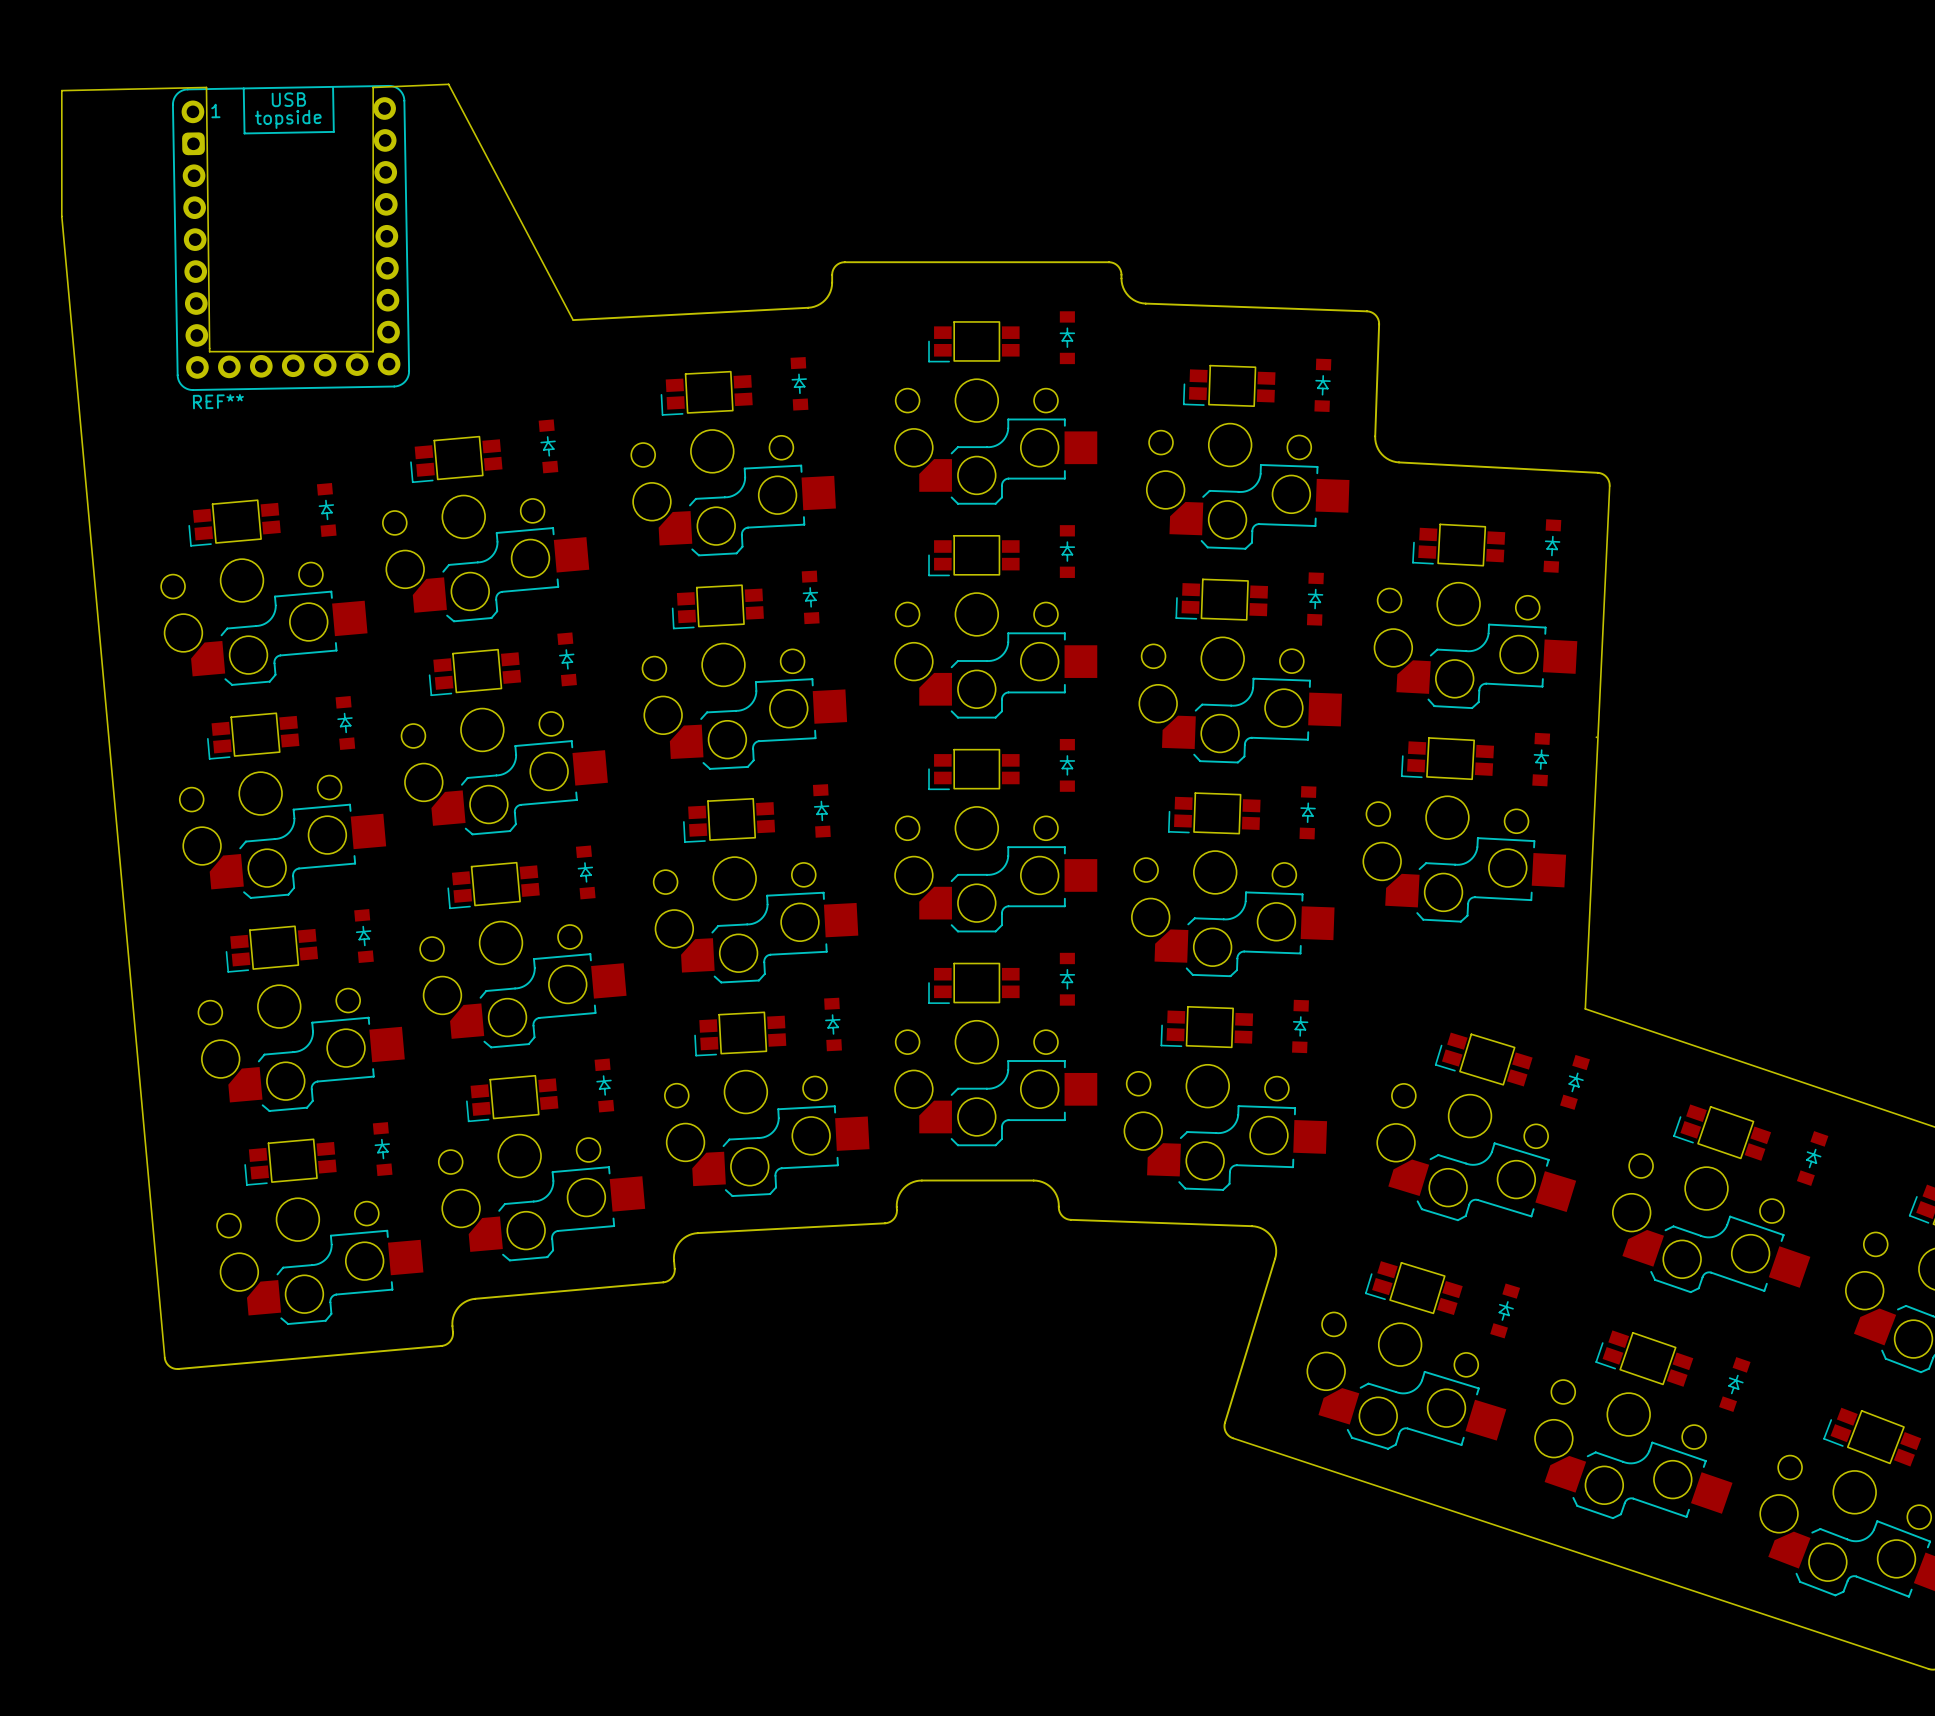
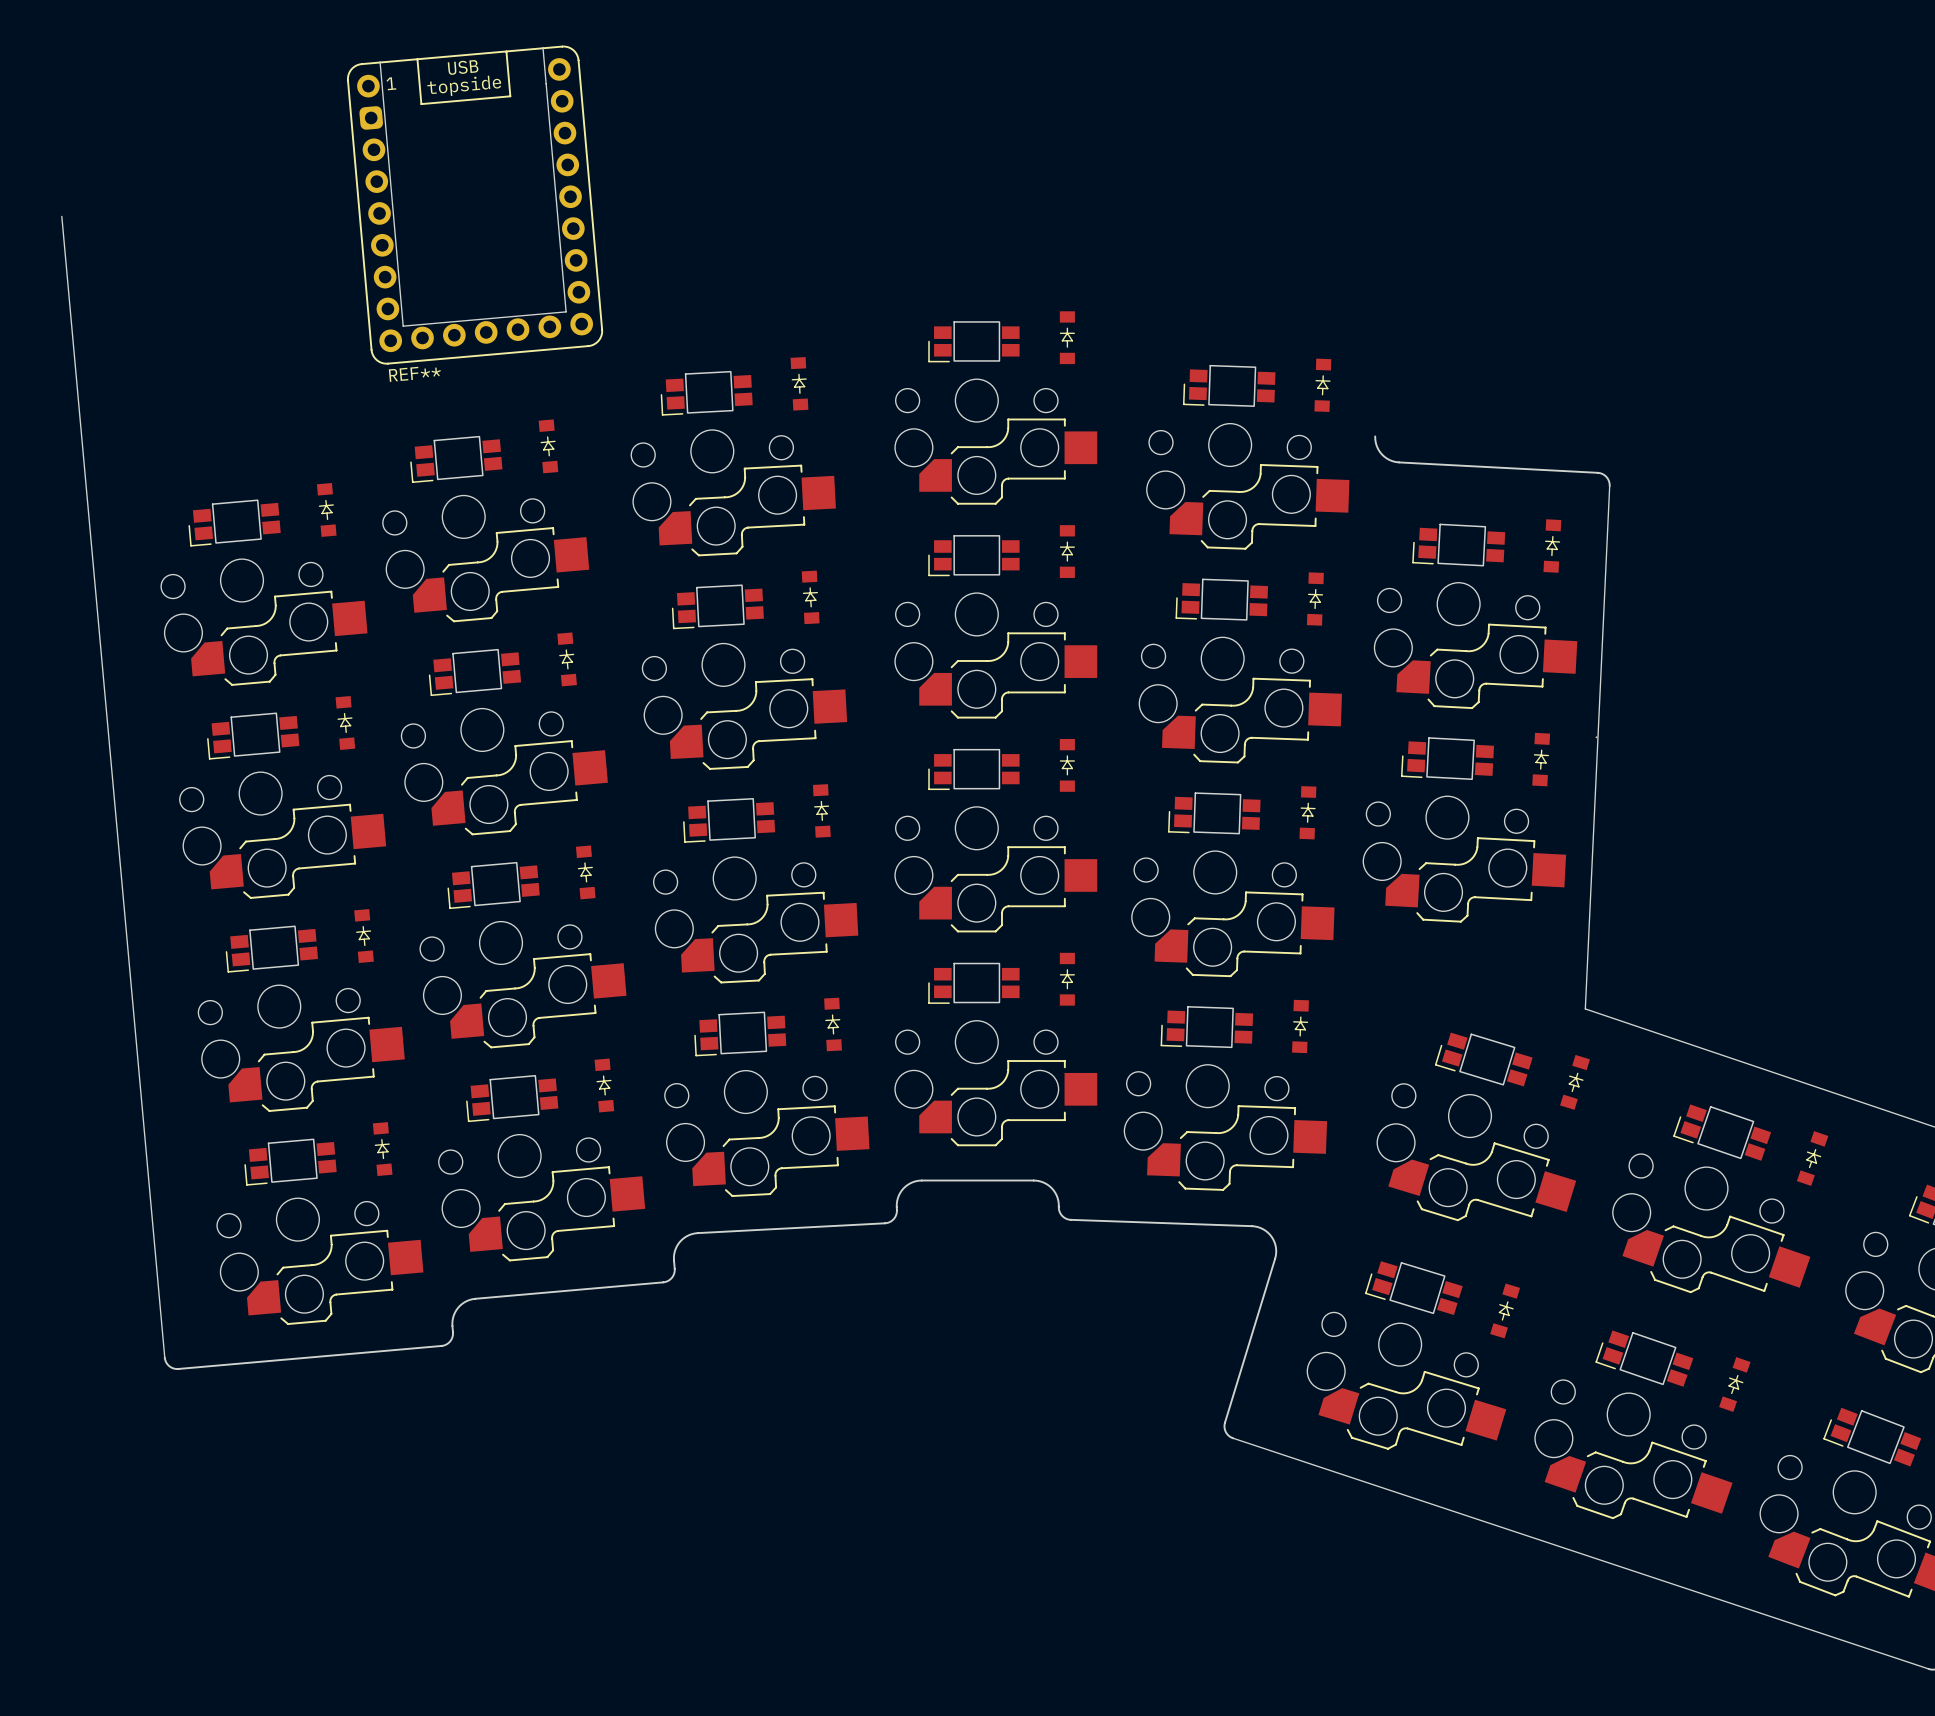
board edge: none -> (542, 47) (566, 311) (403, 326) (380, 61)
REF**: none -> (475, 205)
board edge: (61, 216) (61, 90) (206, 87) (209, 351) (373, 351) (373, 87) (448, 84) (573, 320) (811, 307) (820, 303) (827, 297) (831, 288) (833, 269) (837, 264) (843, 262) (1110, 262) (1119, 268) (1122, 284) (1126, 293) (1133, 299) (1142, 303) (1366, 311) (1373, 313) (1378, 318) (1379, 324) (1375, 436) -> none
REF**: (291, 237) -> none

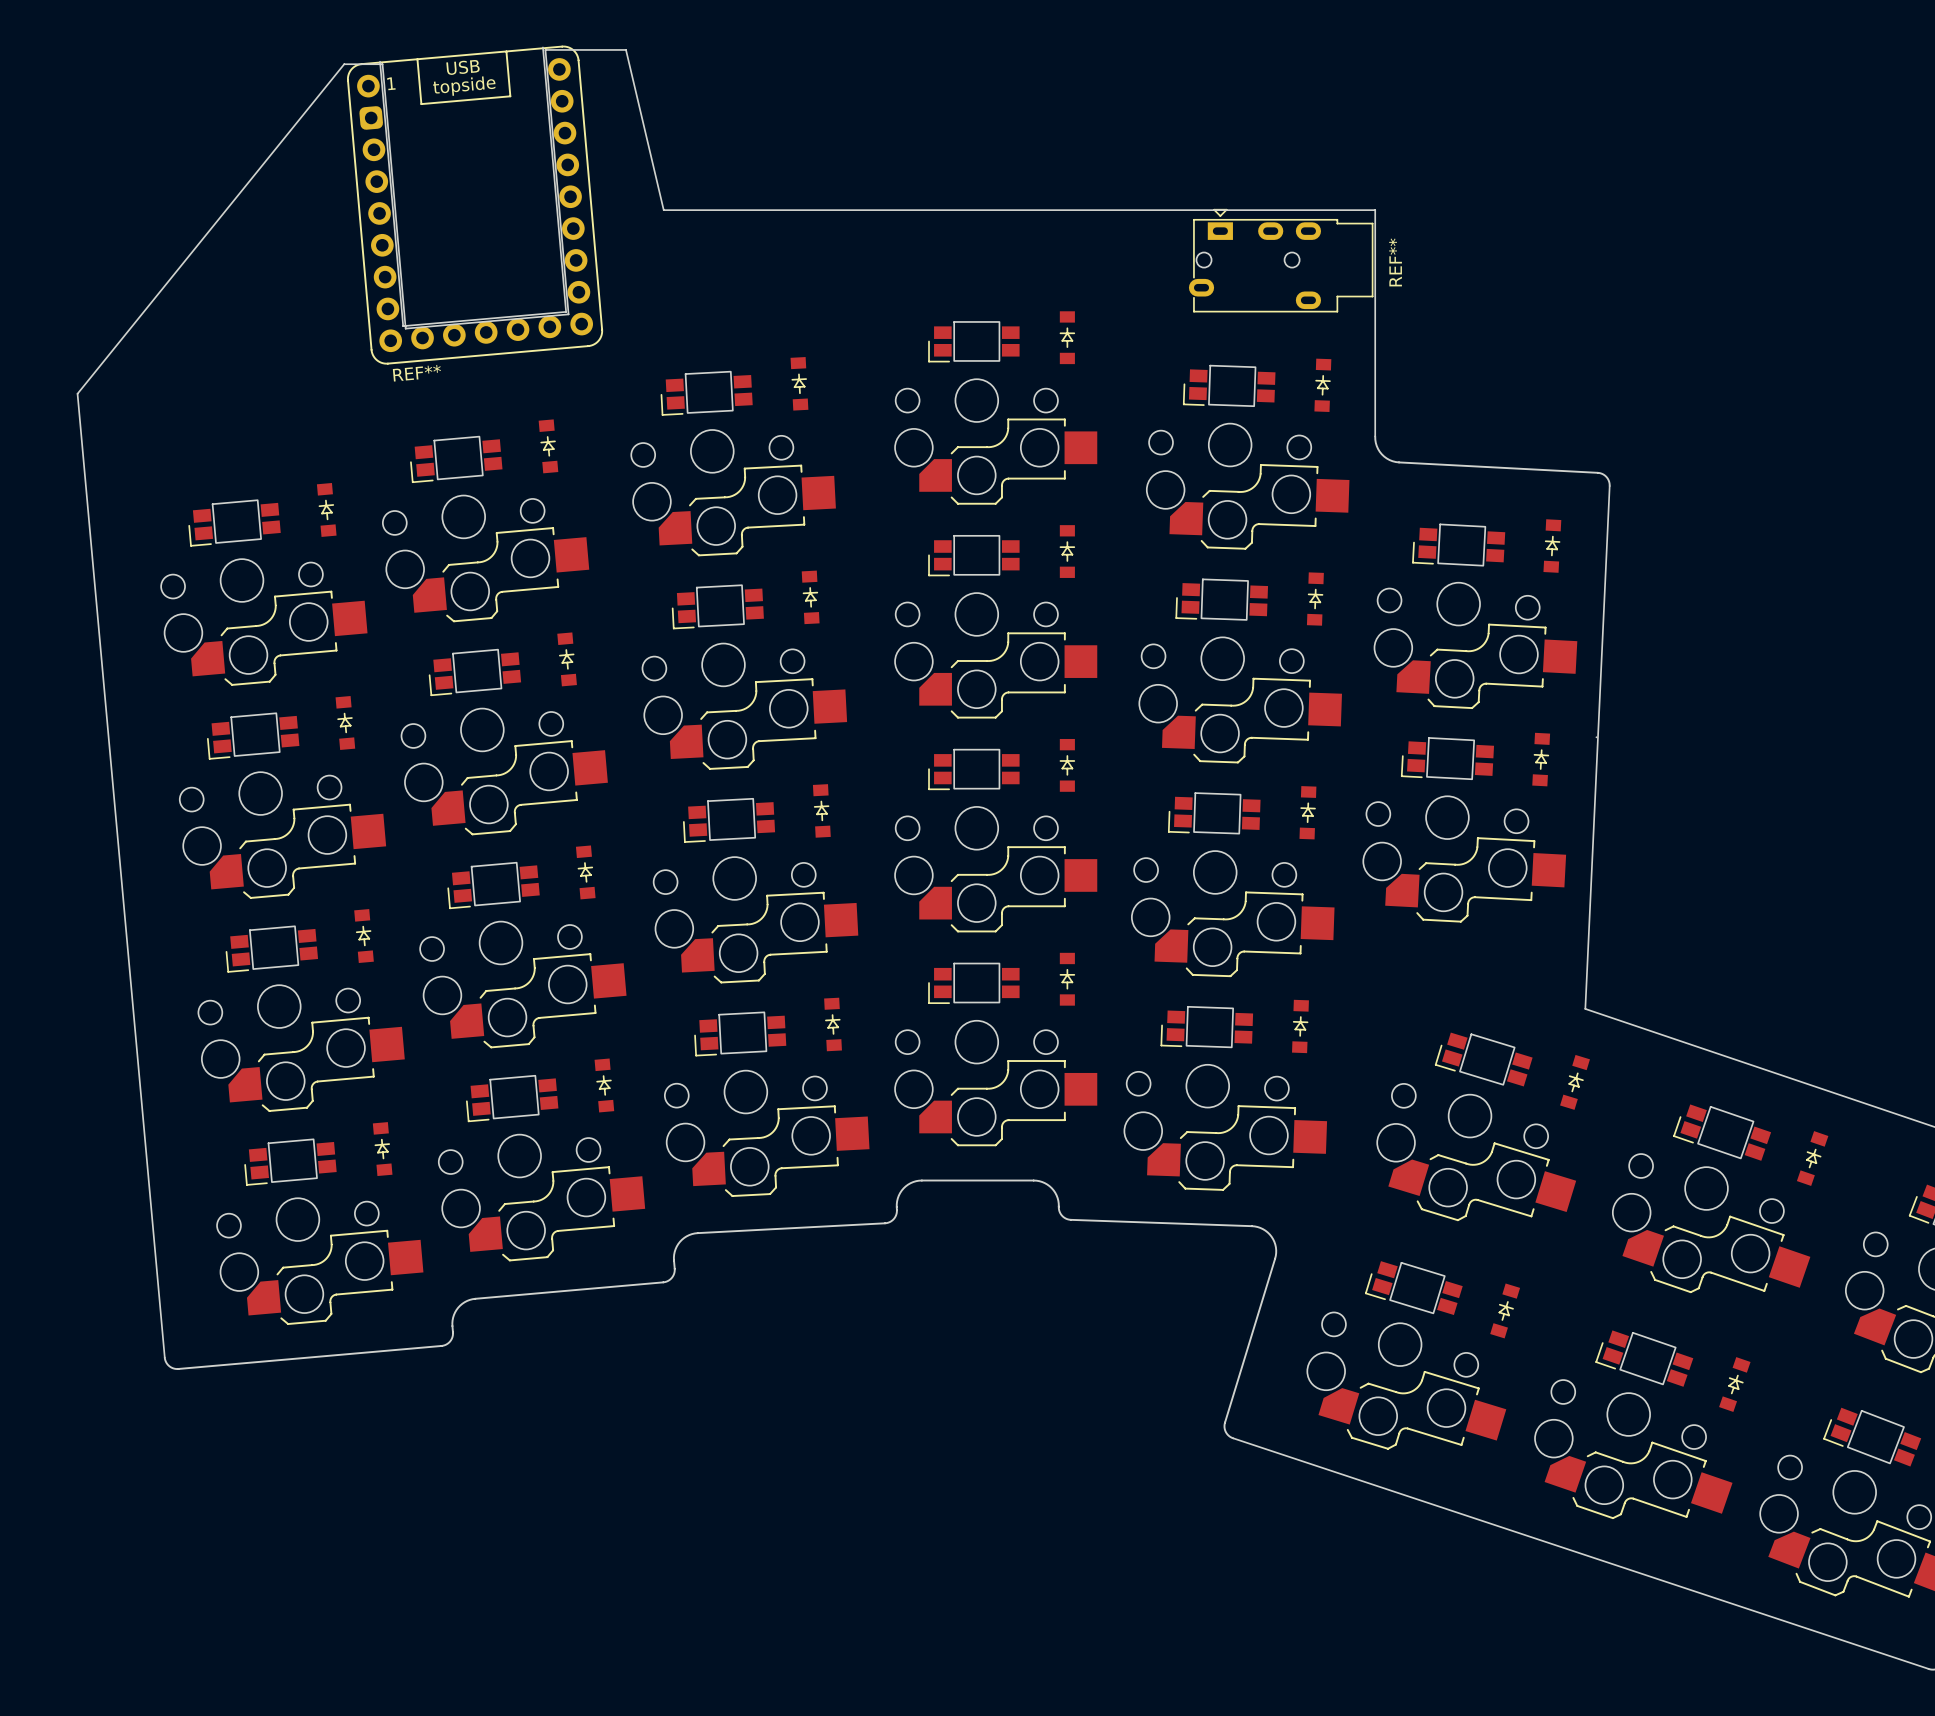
board edge: (61, 216) (164, 1357) -> (1375, 436) (1375, 210) (663, 210) (626, 49) (545, 49) (568, 314) (405, 328) (382, 64) (344, 64) (77, 393) (164, 1357)
REF**: none -> (1281, 260)

